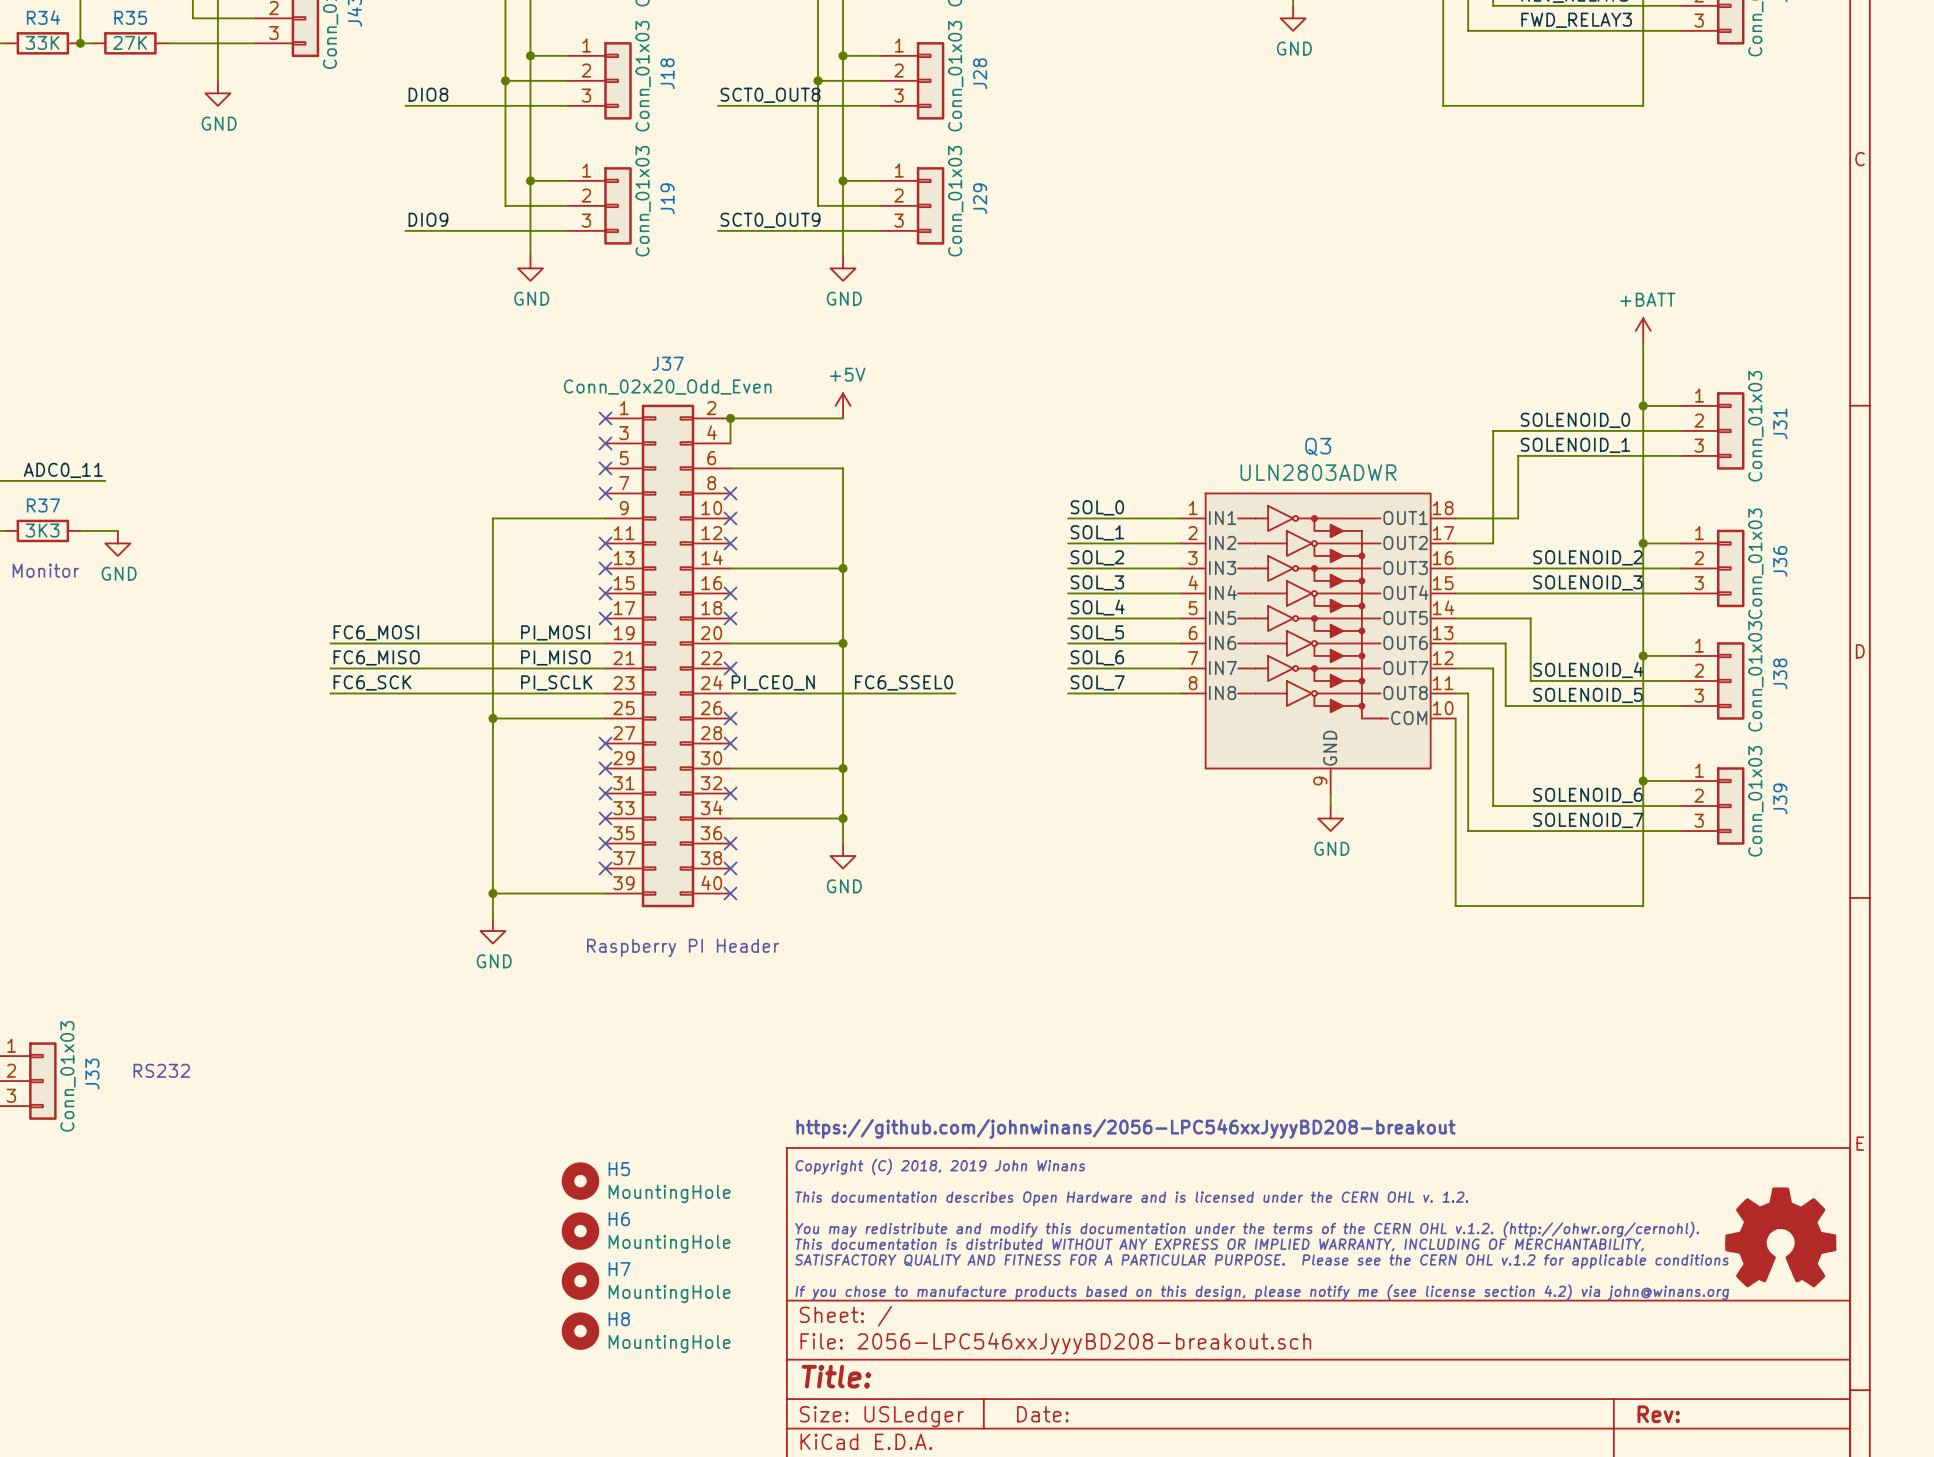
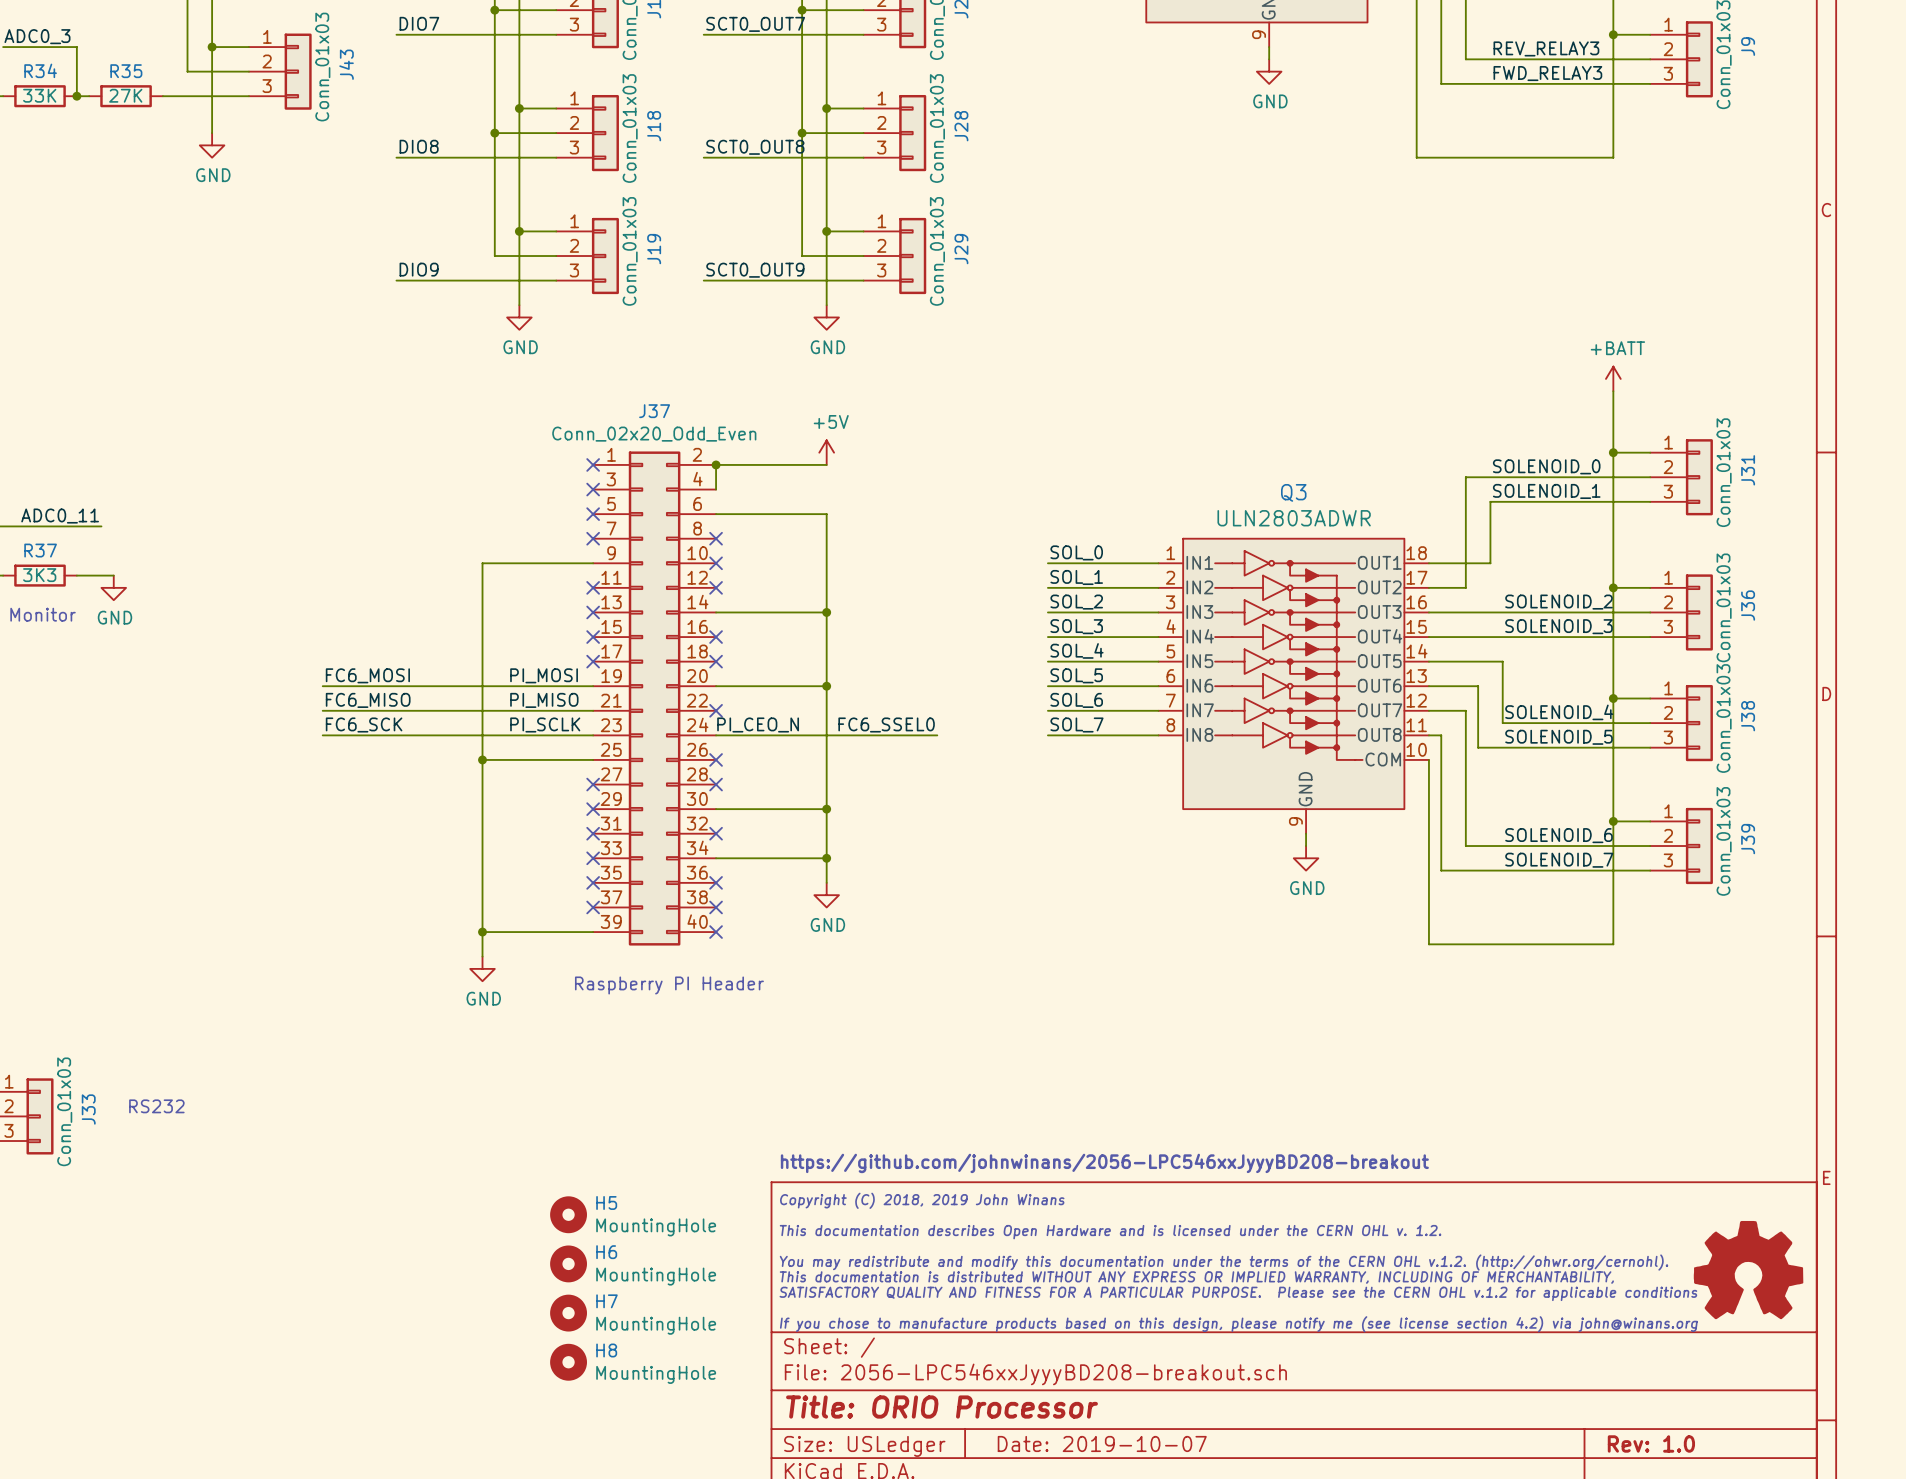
title block: Title: (836, 1376) -> Title: ORIO Processor (941, 1407)
title block: Date: (1042, 1414) -> Date: 2019-10-07 (1102, 1443)
title block: Rev: (1658, 1414) -> Rev: 1.0 (1651, 1443)

